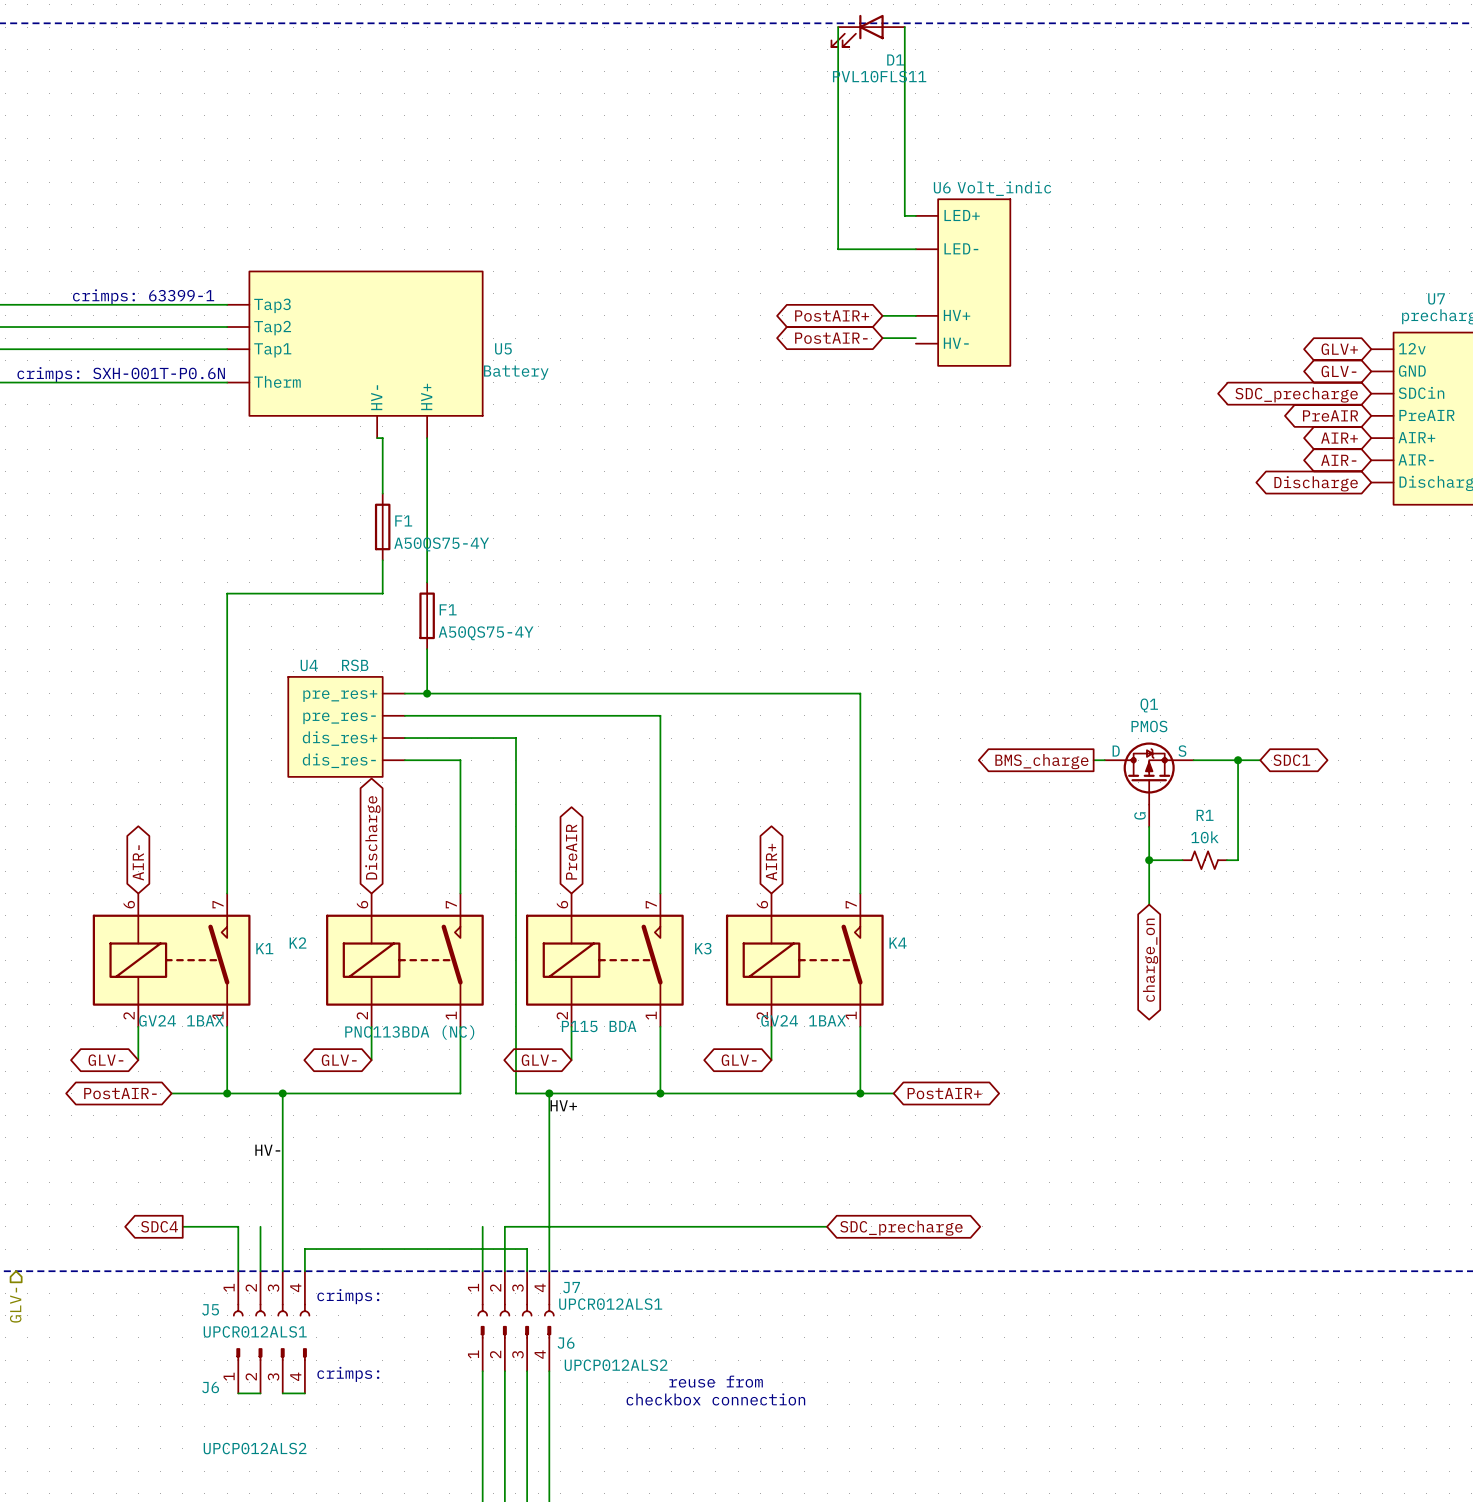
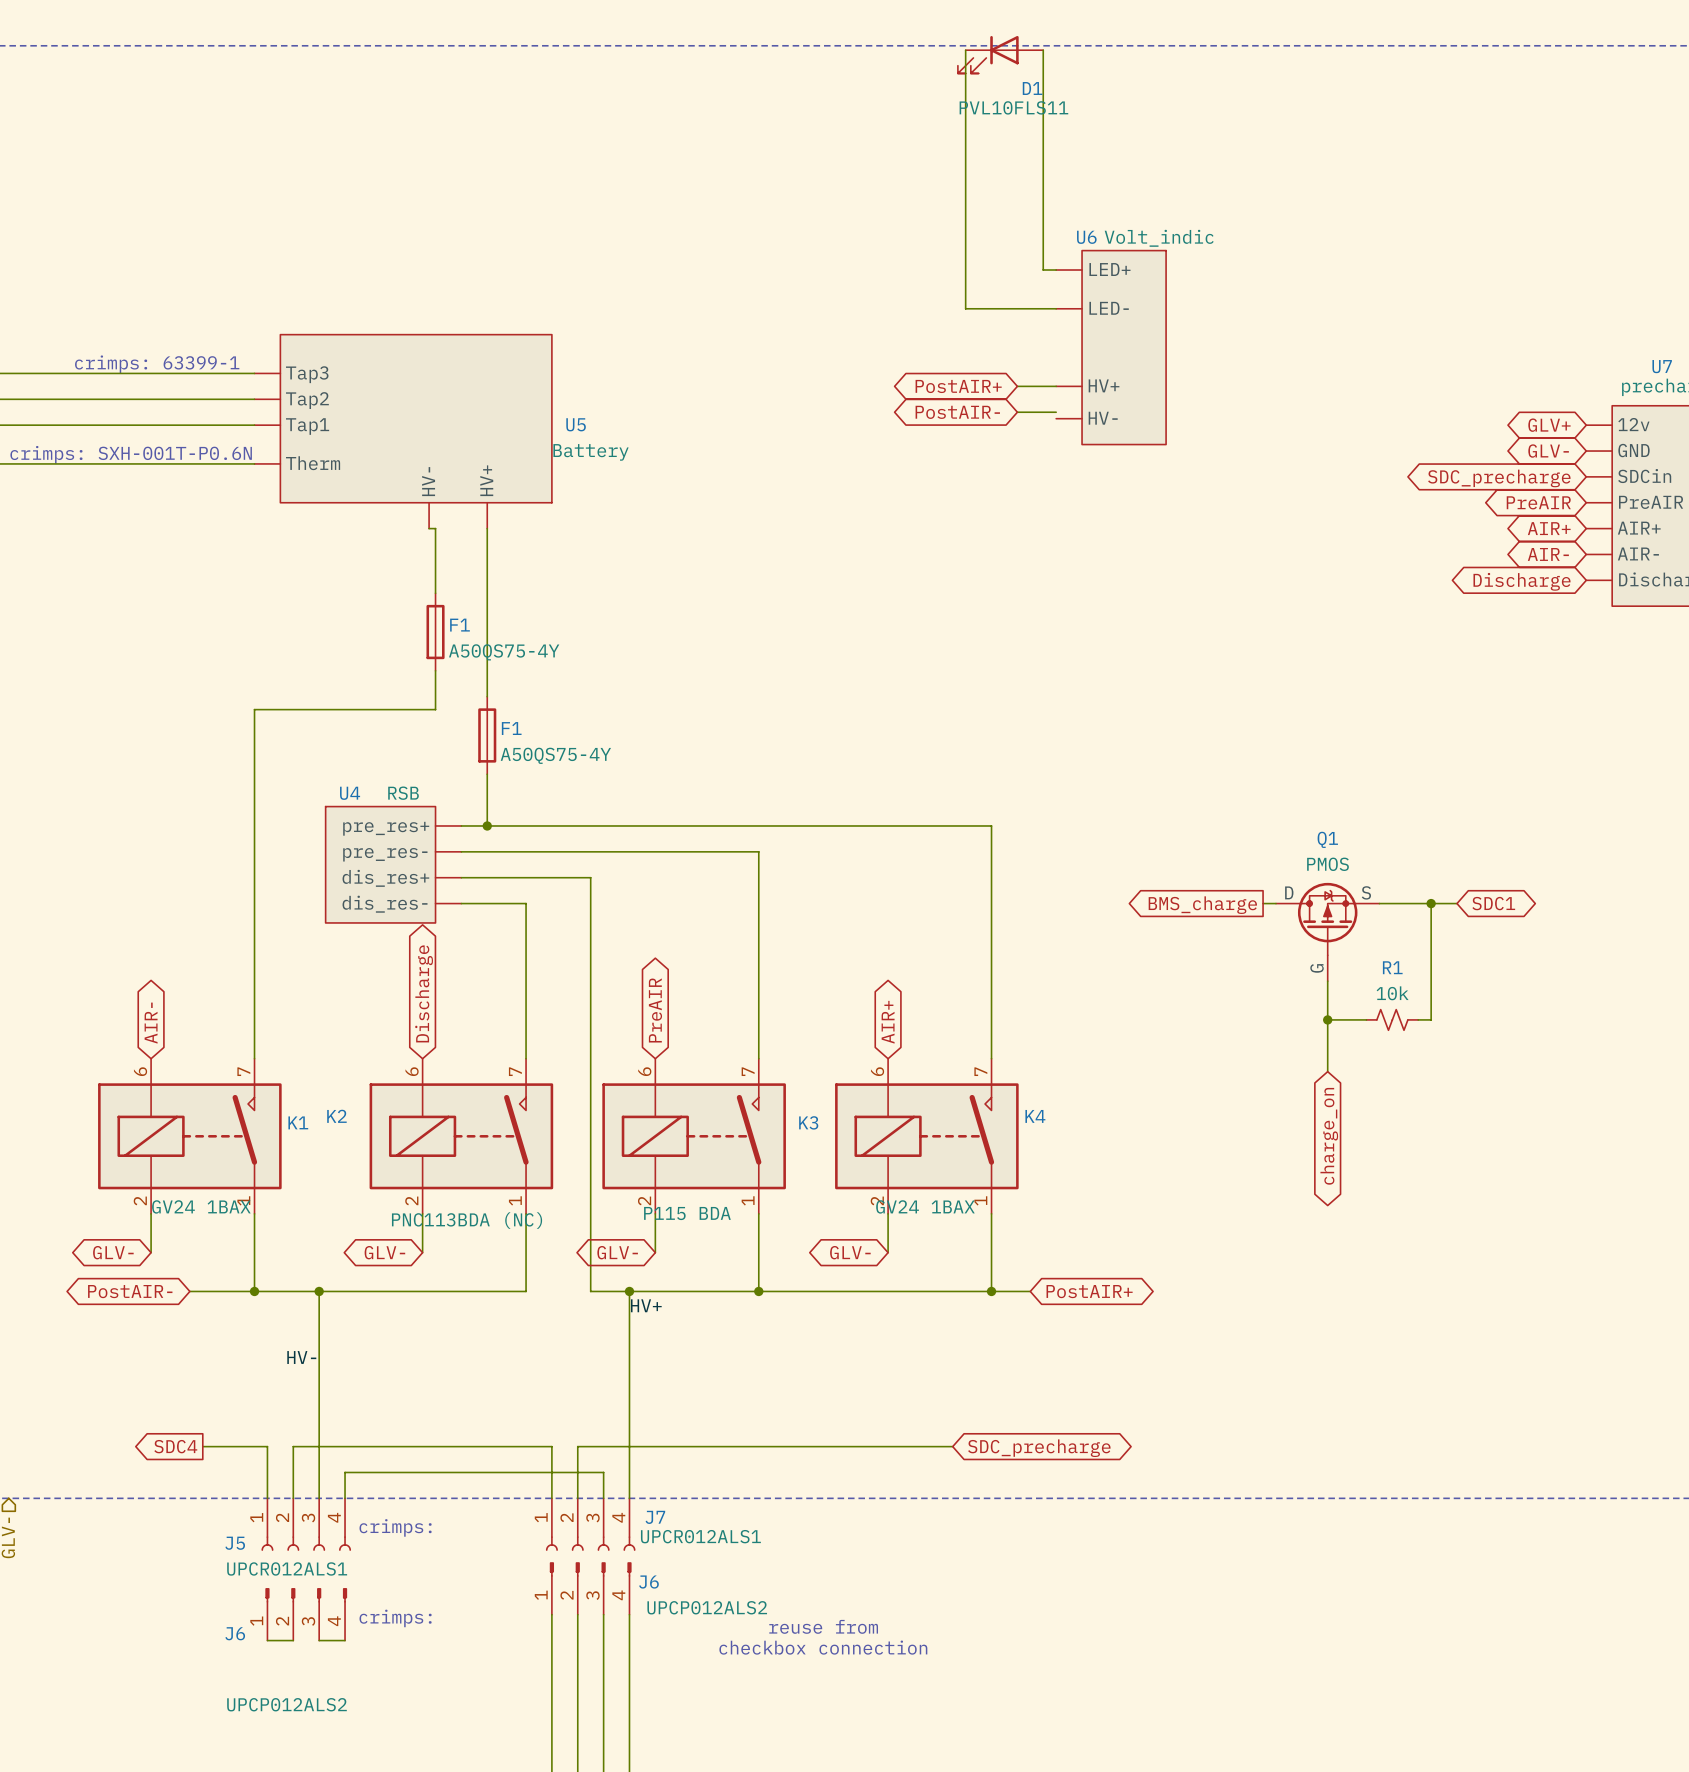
wire: none -> (293, 1446) (551, 1446)

